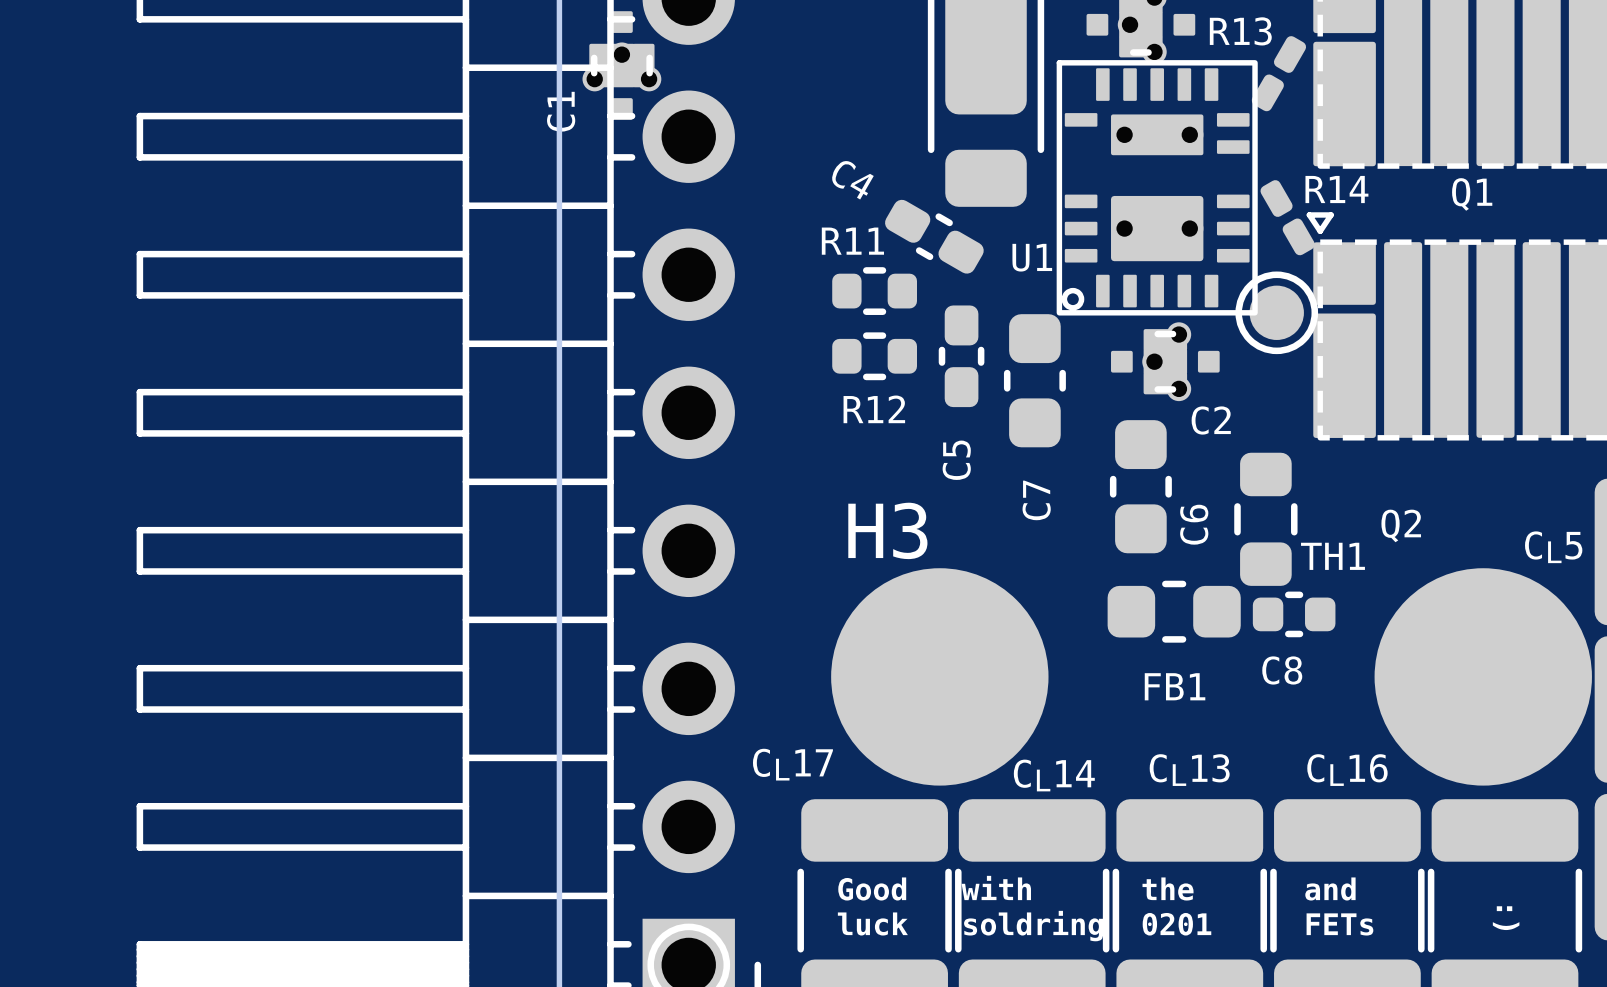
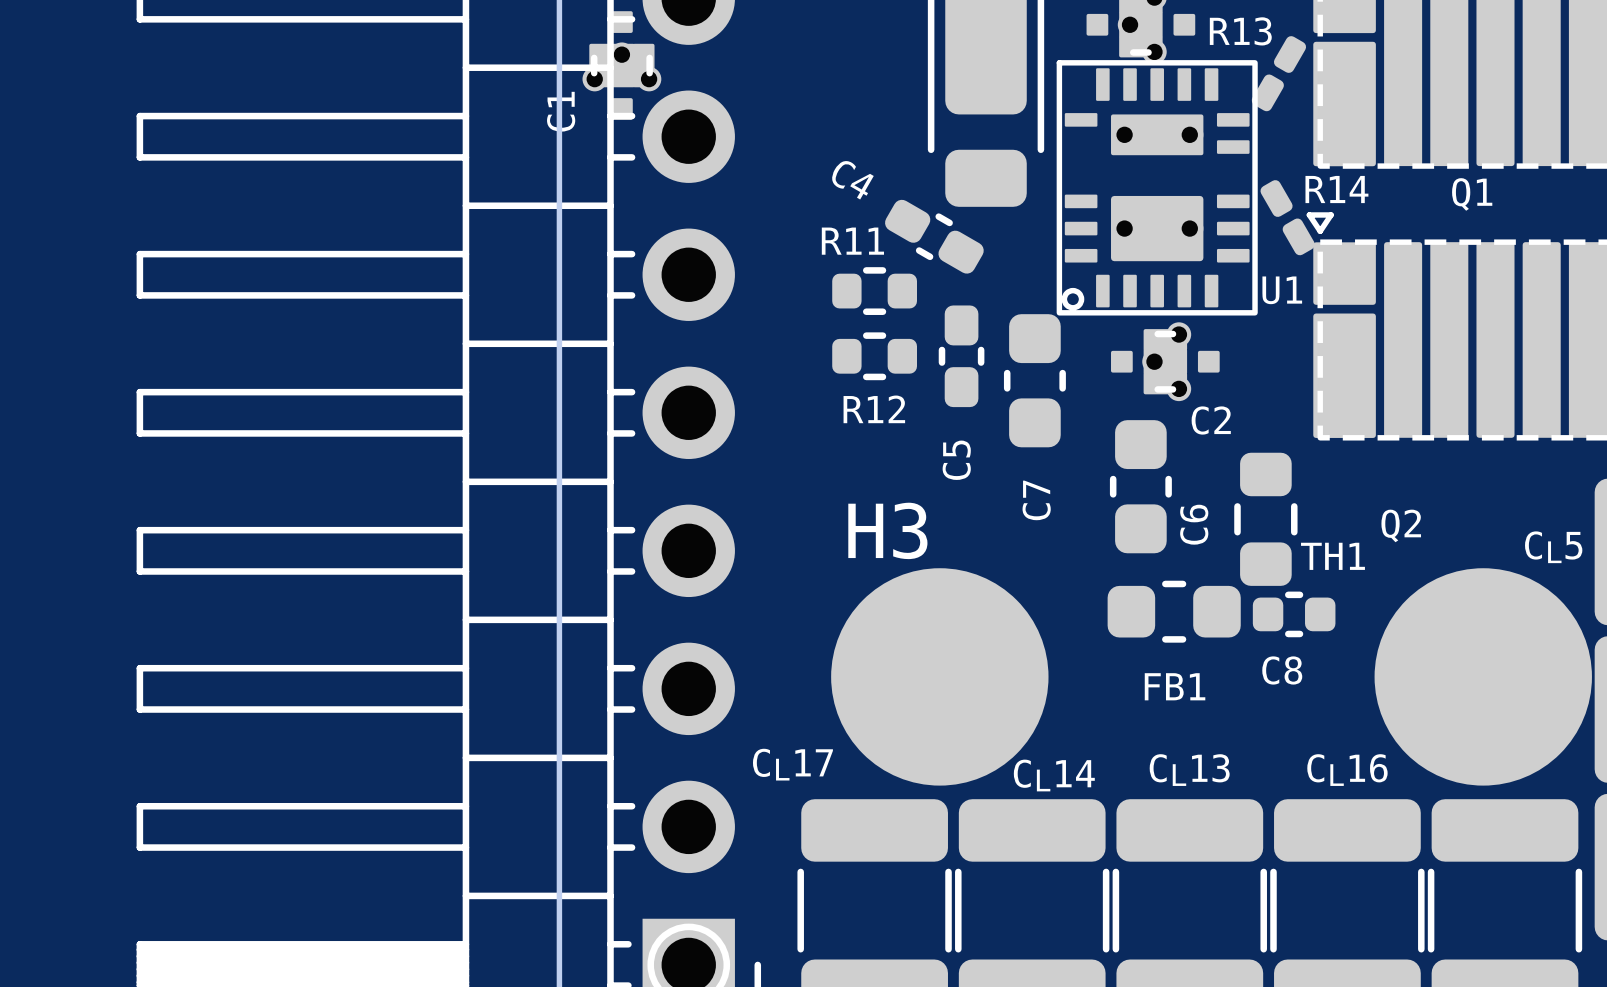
U1 name position: U1 (1032, 257) -> U1 (1282, 290)
part: (1276, 312) -> none
text: with (996, 887) -> none
text: Good (872, 888) -> none
text: the (1168, 888) -> none
text: and (1330, 888) -> none
text: :) (1506, 918) -> none
text: luck (872, 923) -> none
text: 0201 (1176, 924) -> none
text: FETs (1339, 924) -> none
text: soldring (1033, 926) -> none

